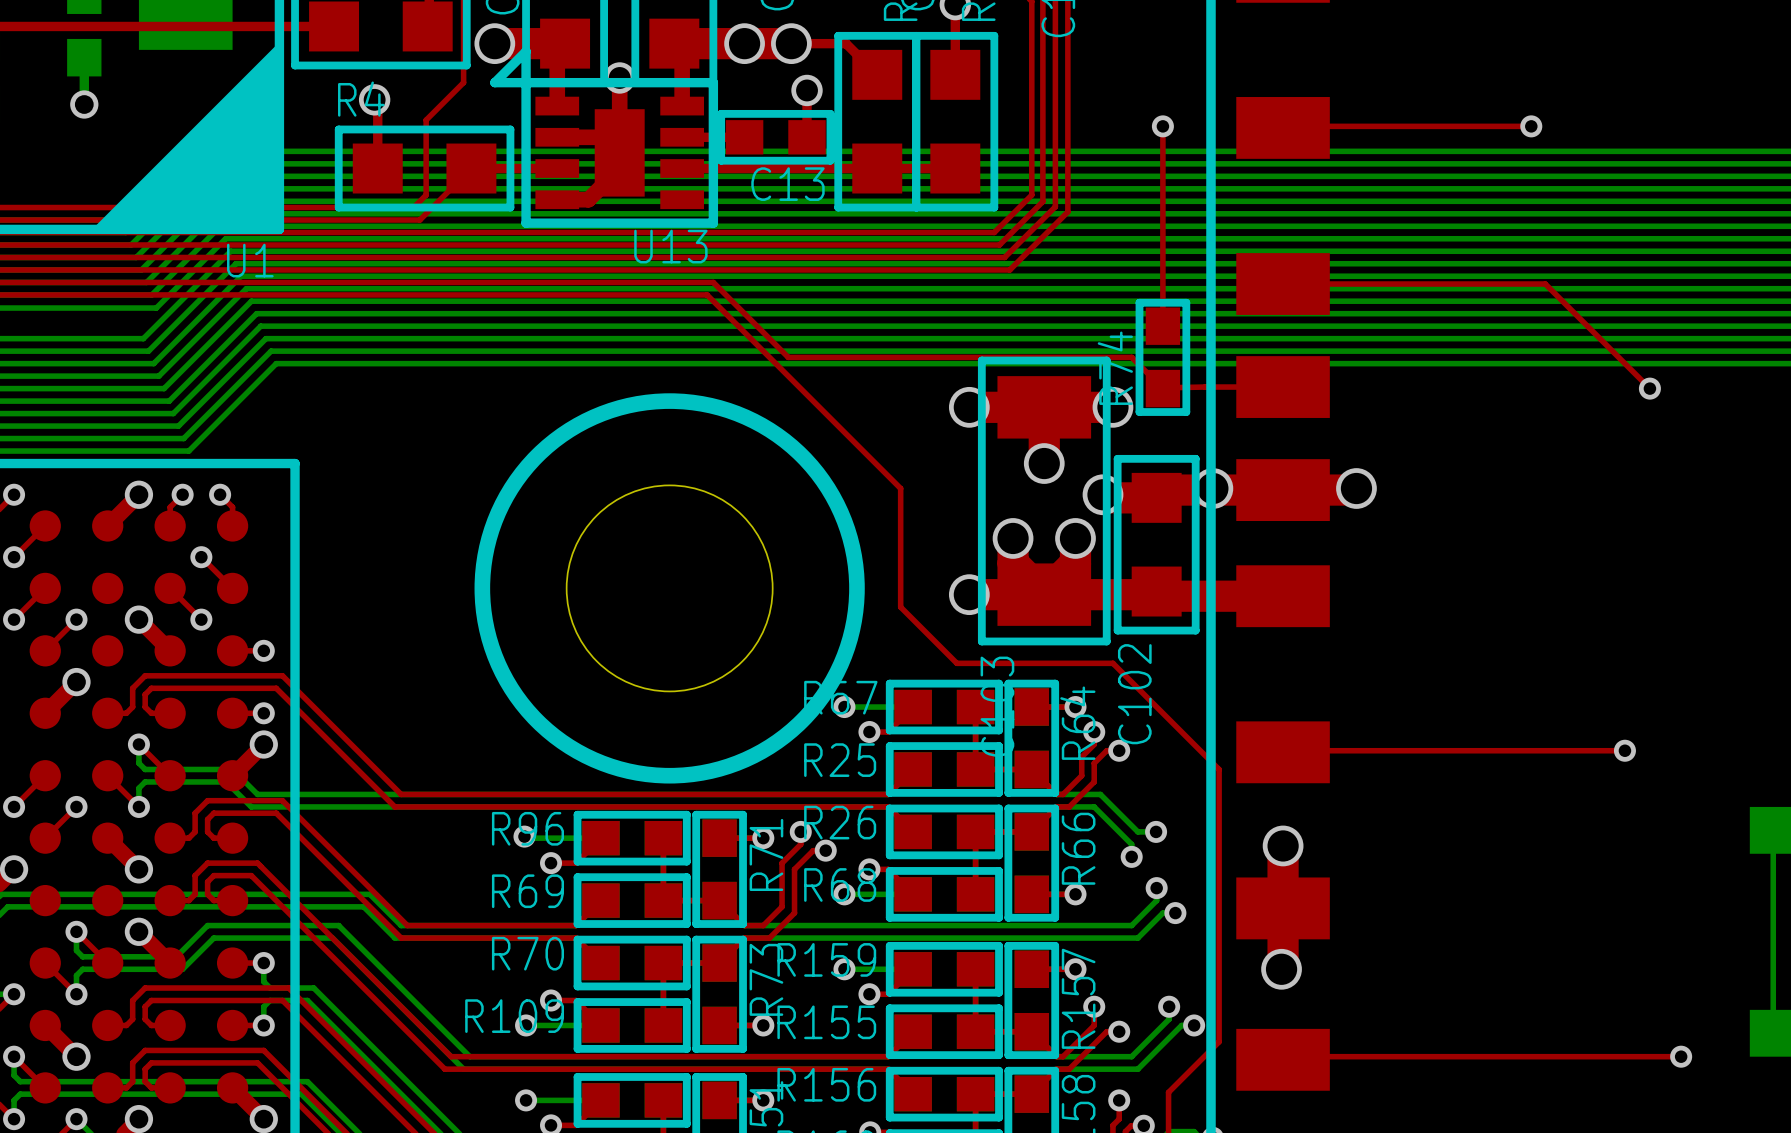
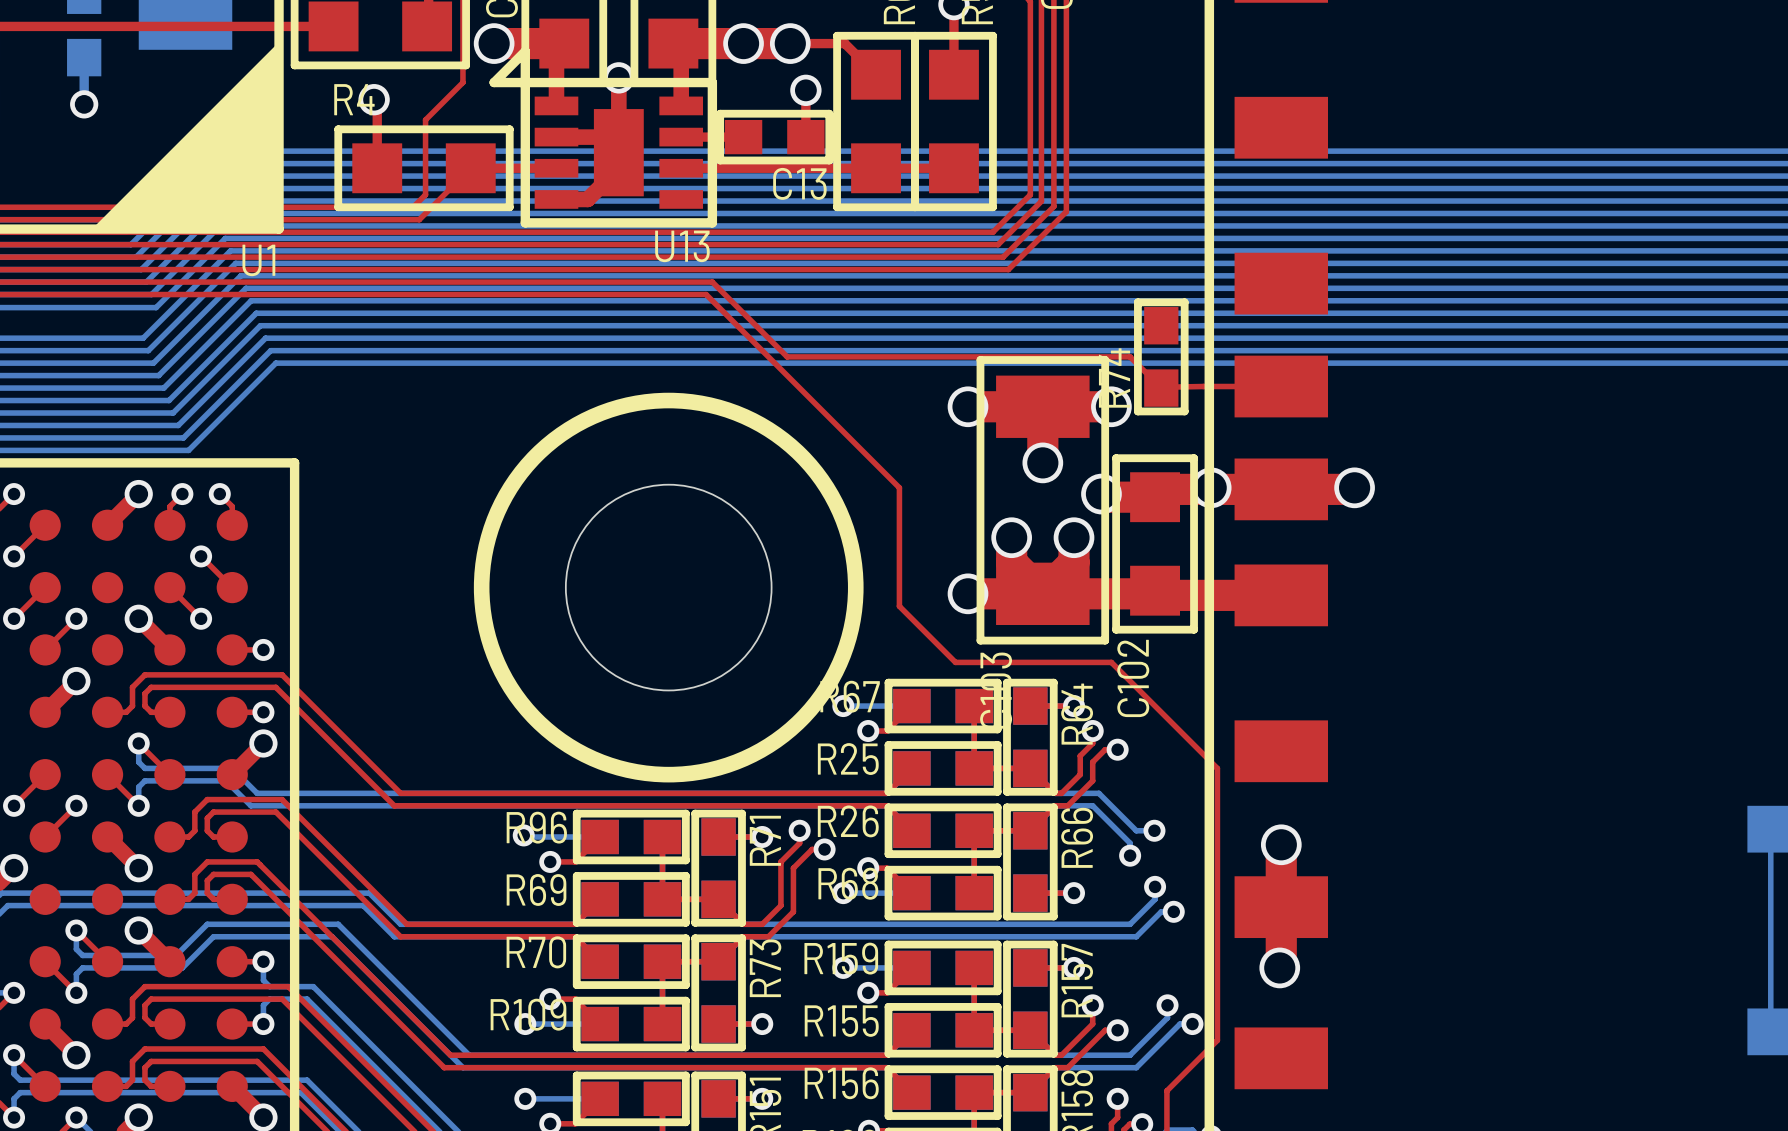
top track: (1162, 126) (1162, 326) -> none
via: (1162, 126) -> none
top track: (1531, 126) (1284, 126) (1283, 127) -> none
via: (1531, 126) -> none
top track: (1283, 284) (1545, 284) (1649, 388) -> none
via: (1649, 388) -> none
top track: (1624, 750) (1284, 750) (1283, 752) -> none
via: (1624, 750) -> none
top track: (1681, 1056) (1286, 1056) (1283, 1059) -> none
via: (1681, 1056) -> none

